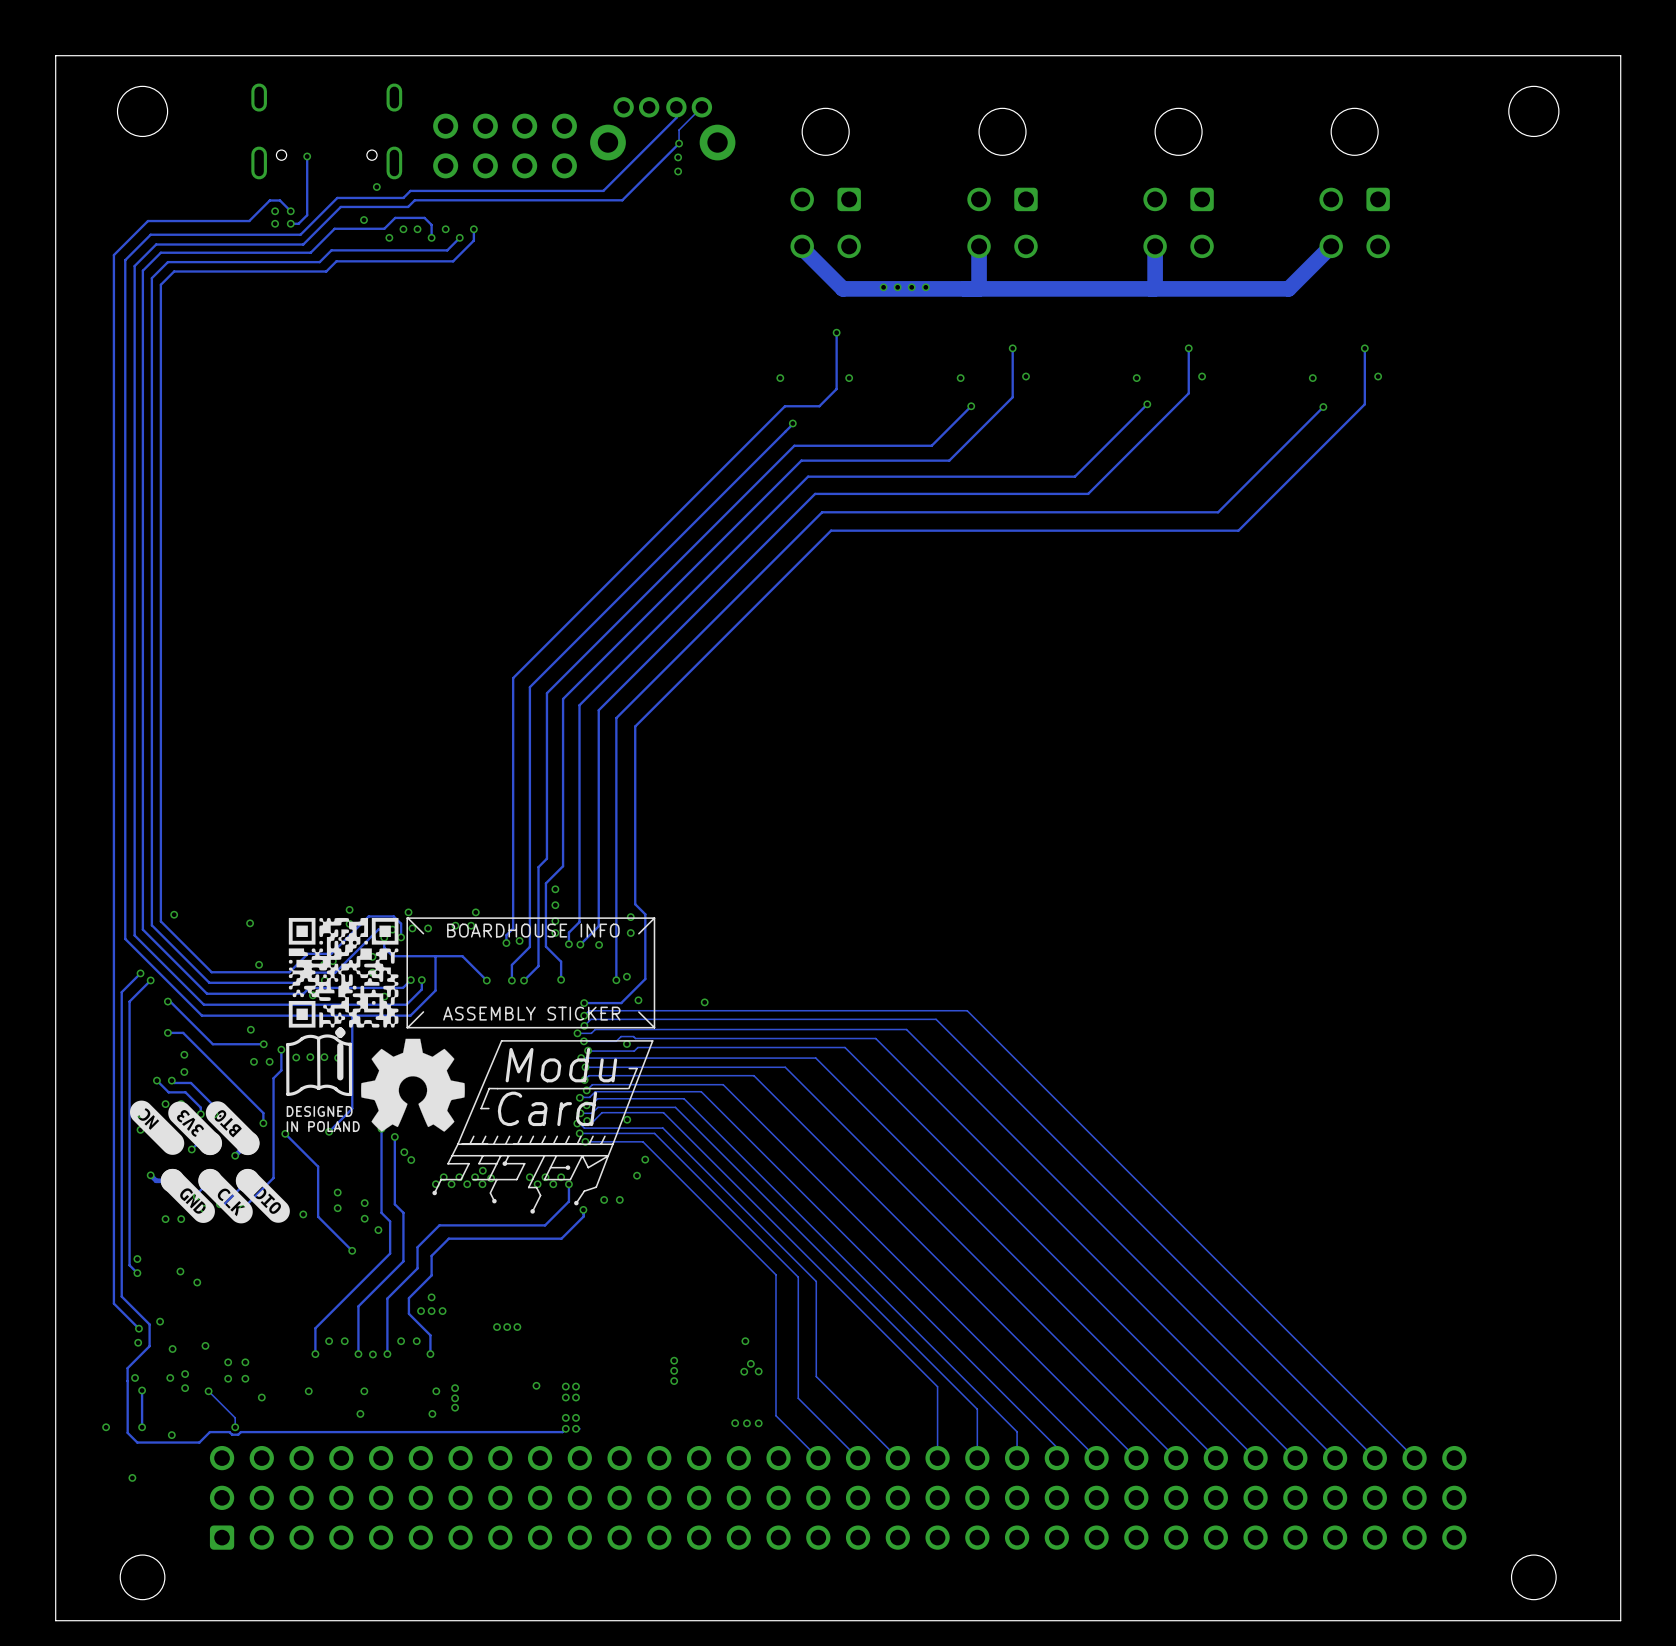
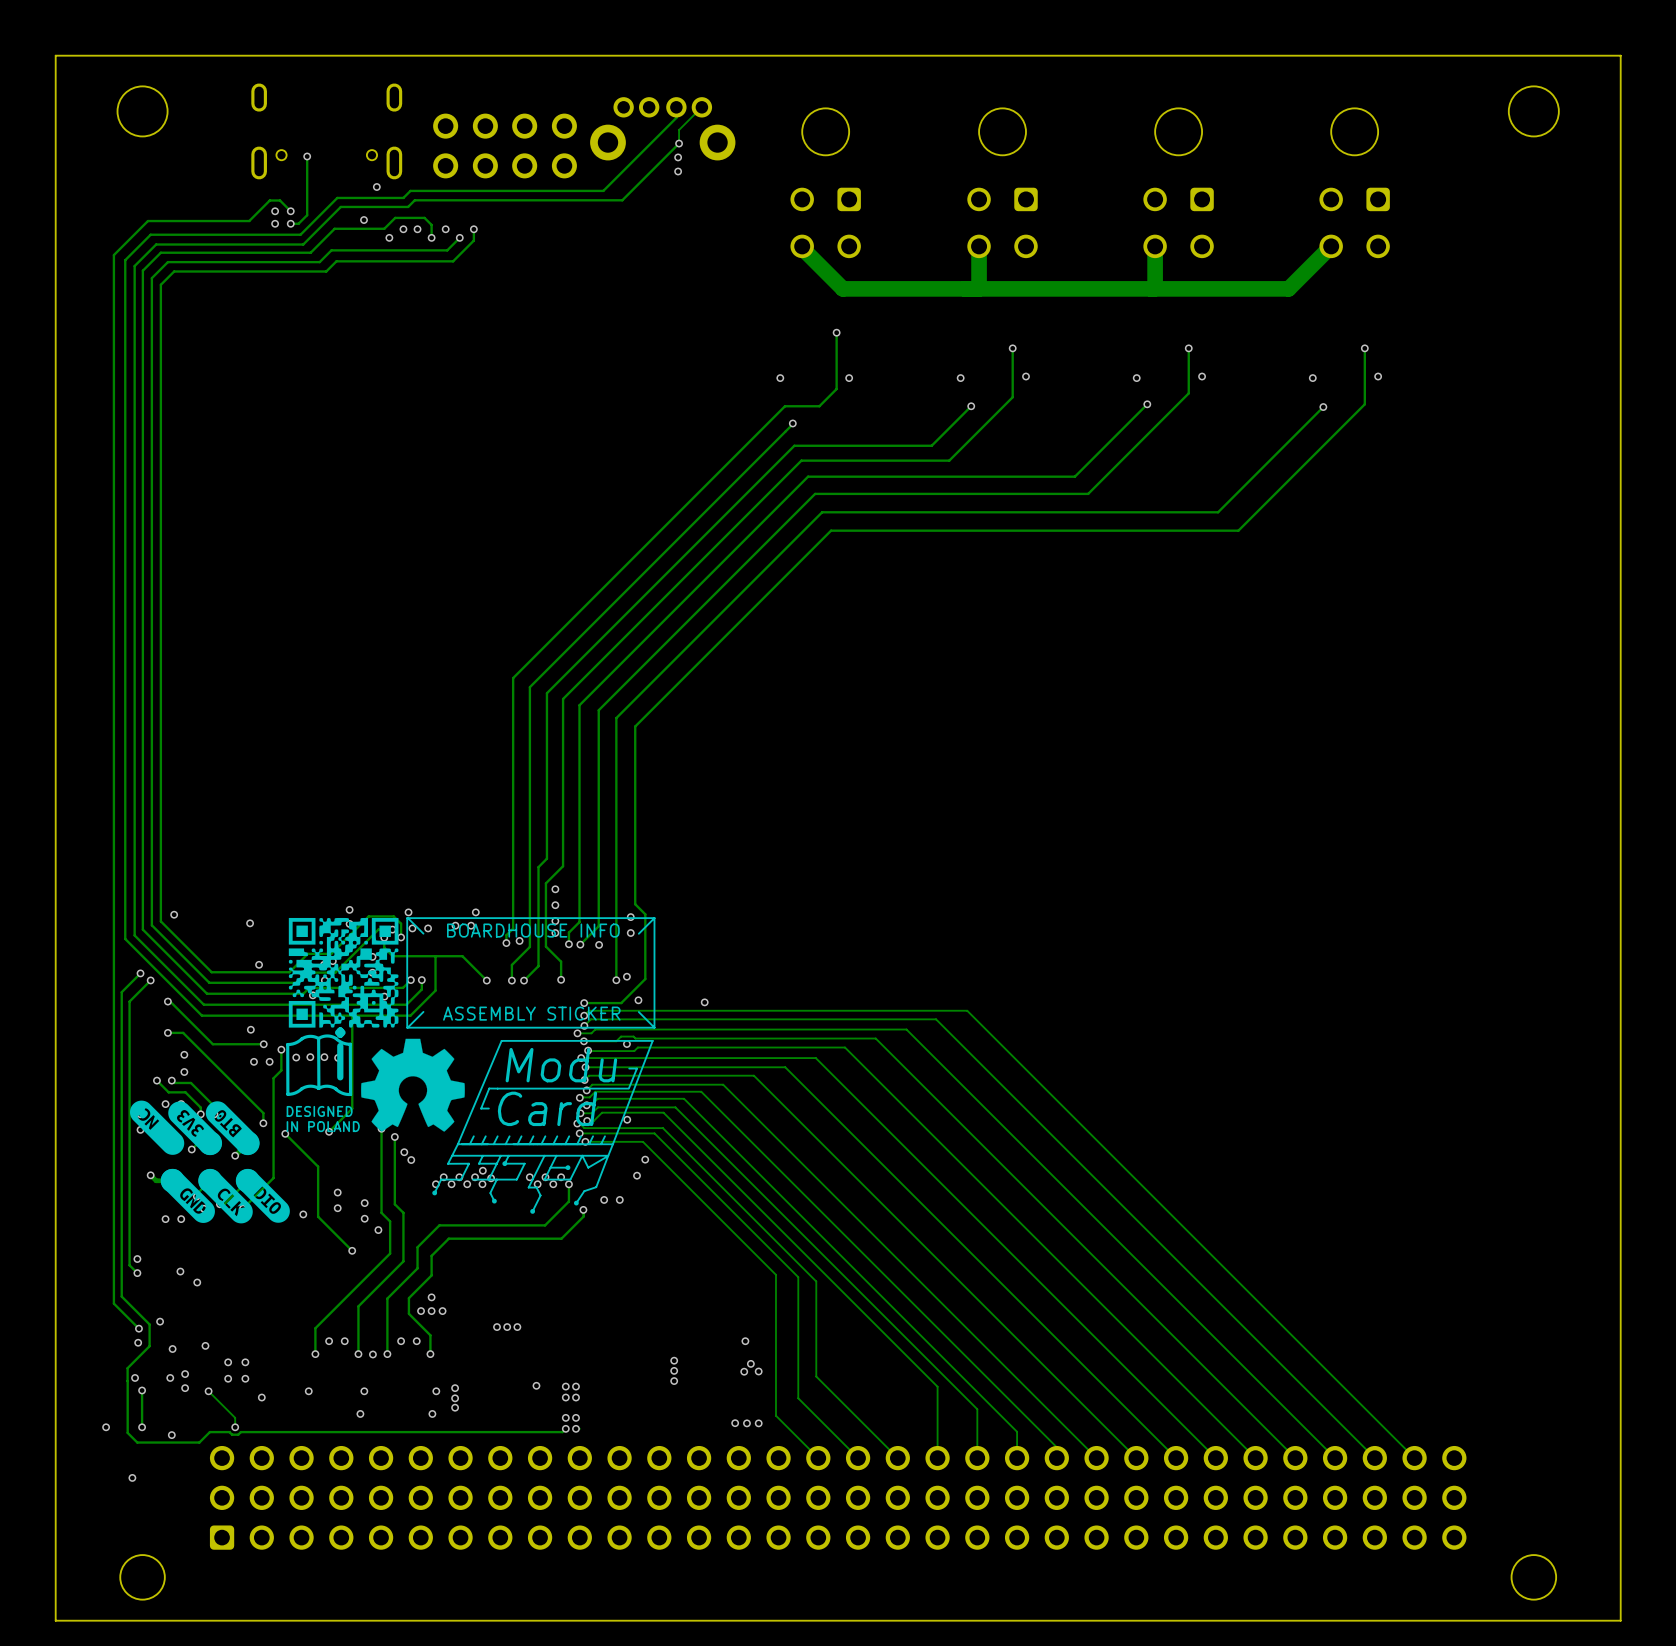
via: (883, 287) -> none
via: (897, 287) -> none
via: (911, 287) -> none
via: (925, 287) -> none

